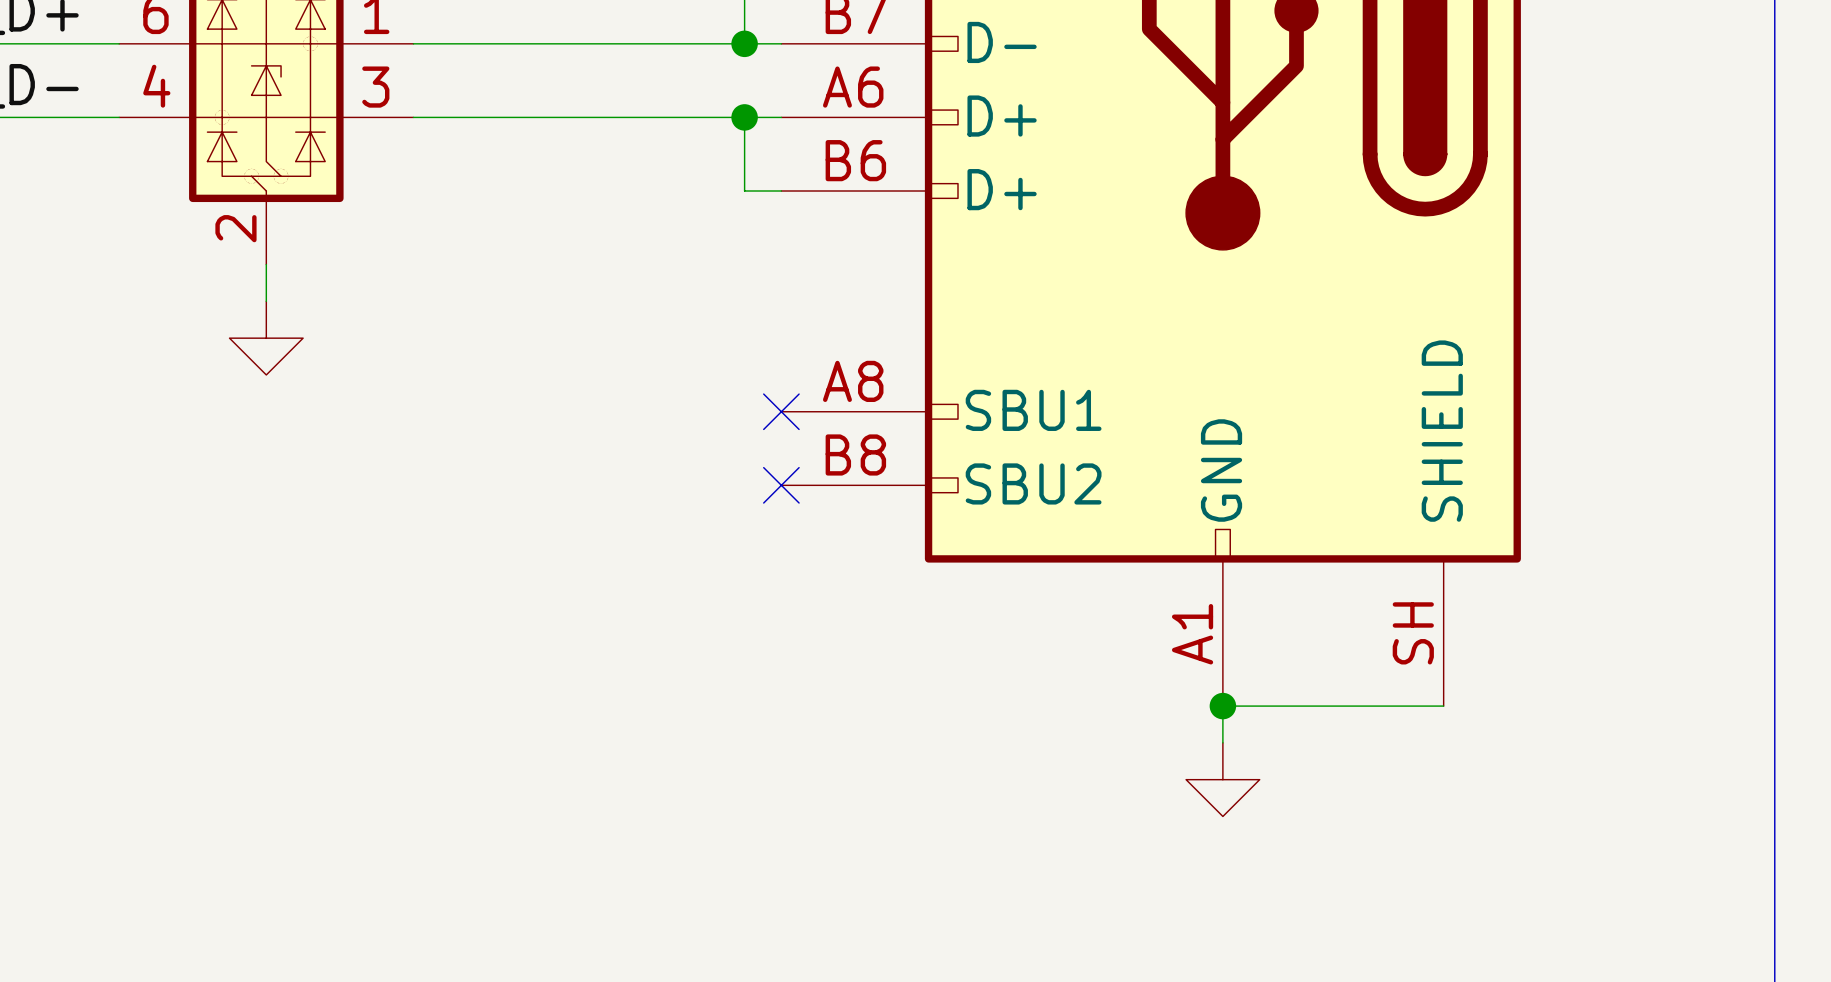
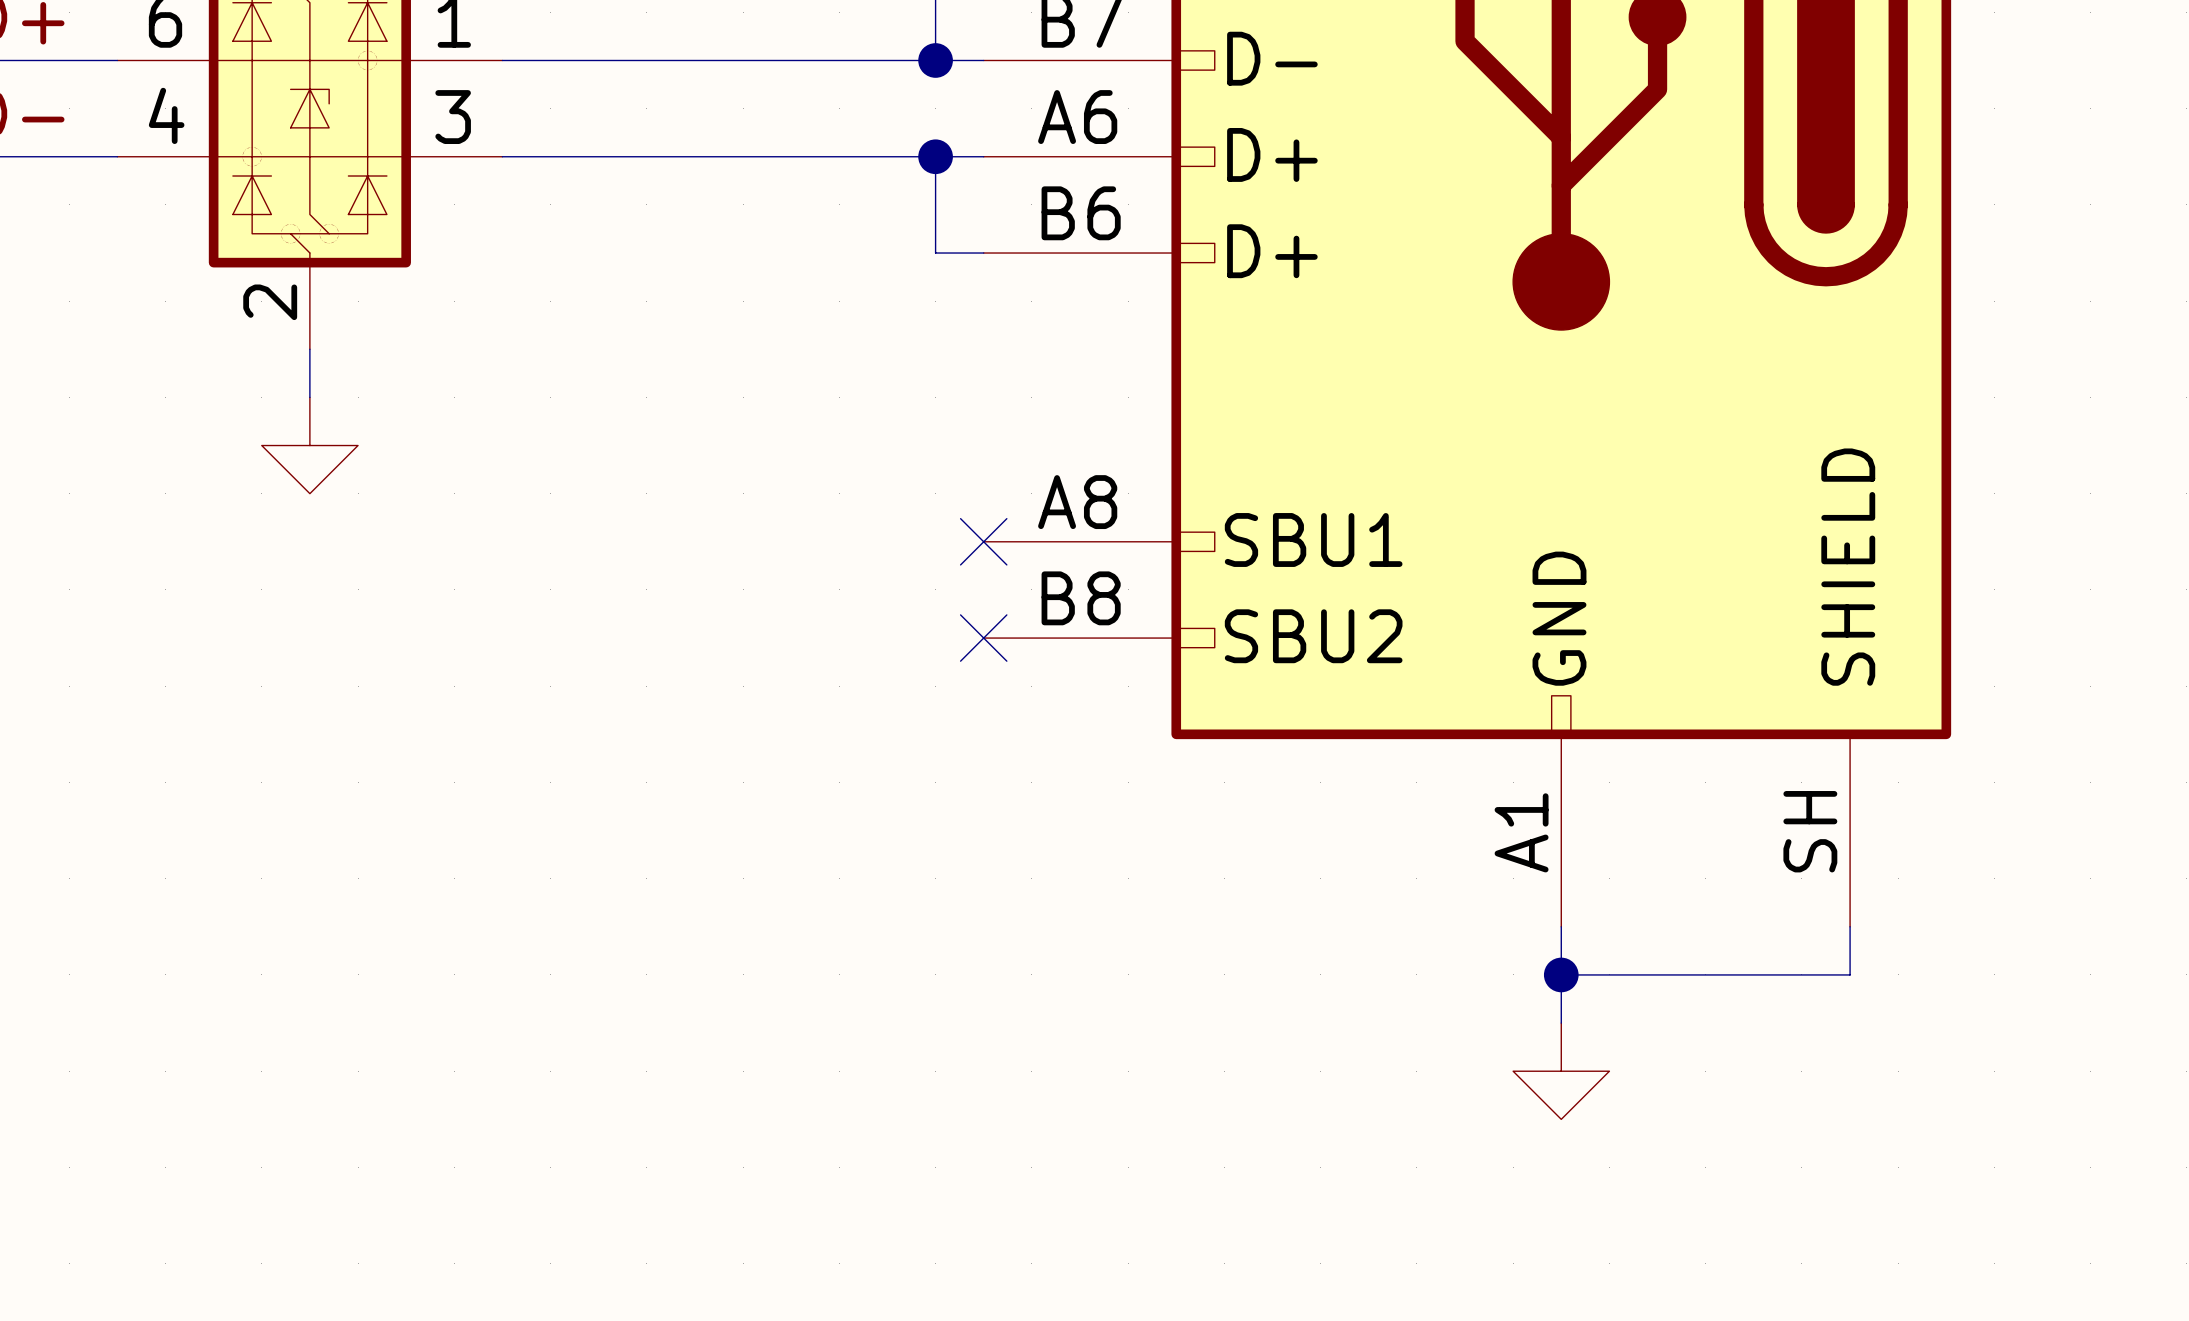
wire: (1222, 706) (1443, 706) -> (1561, 1023) (1561, 974) (1850, 974) (1850, 926)
junction position: (1222, 706) -> (1561, 974)
power symbol position: (1222, 779) -> (1561, 1071)

